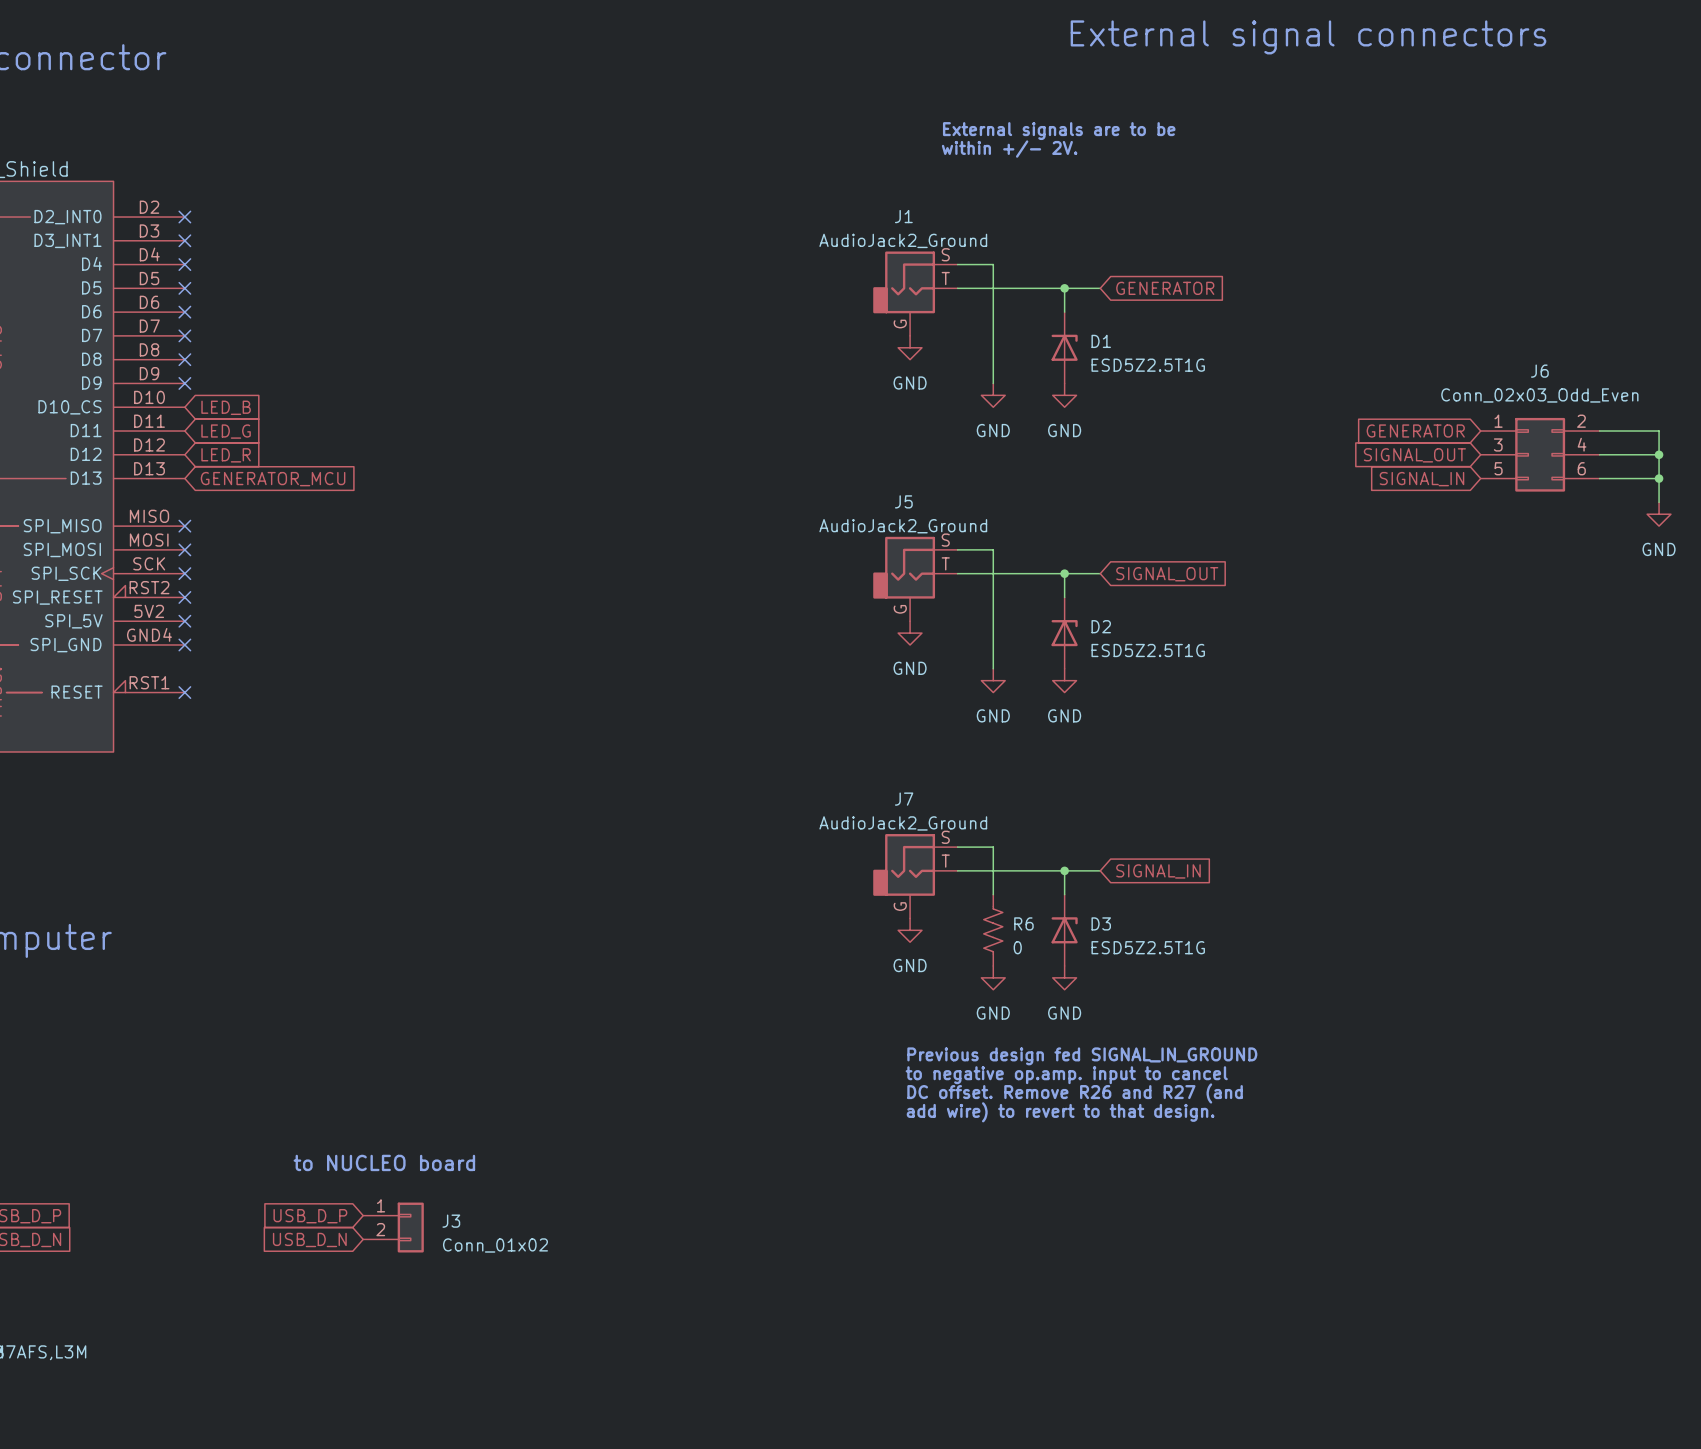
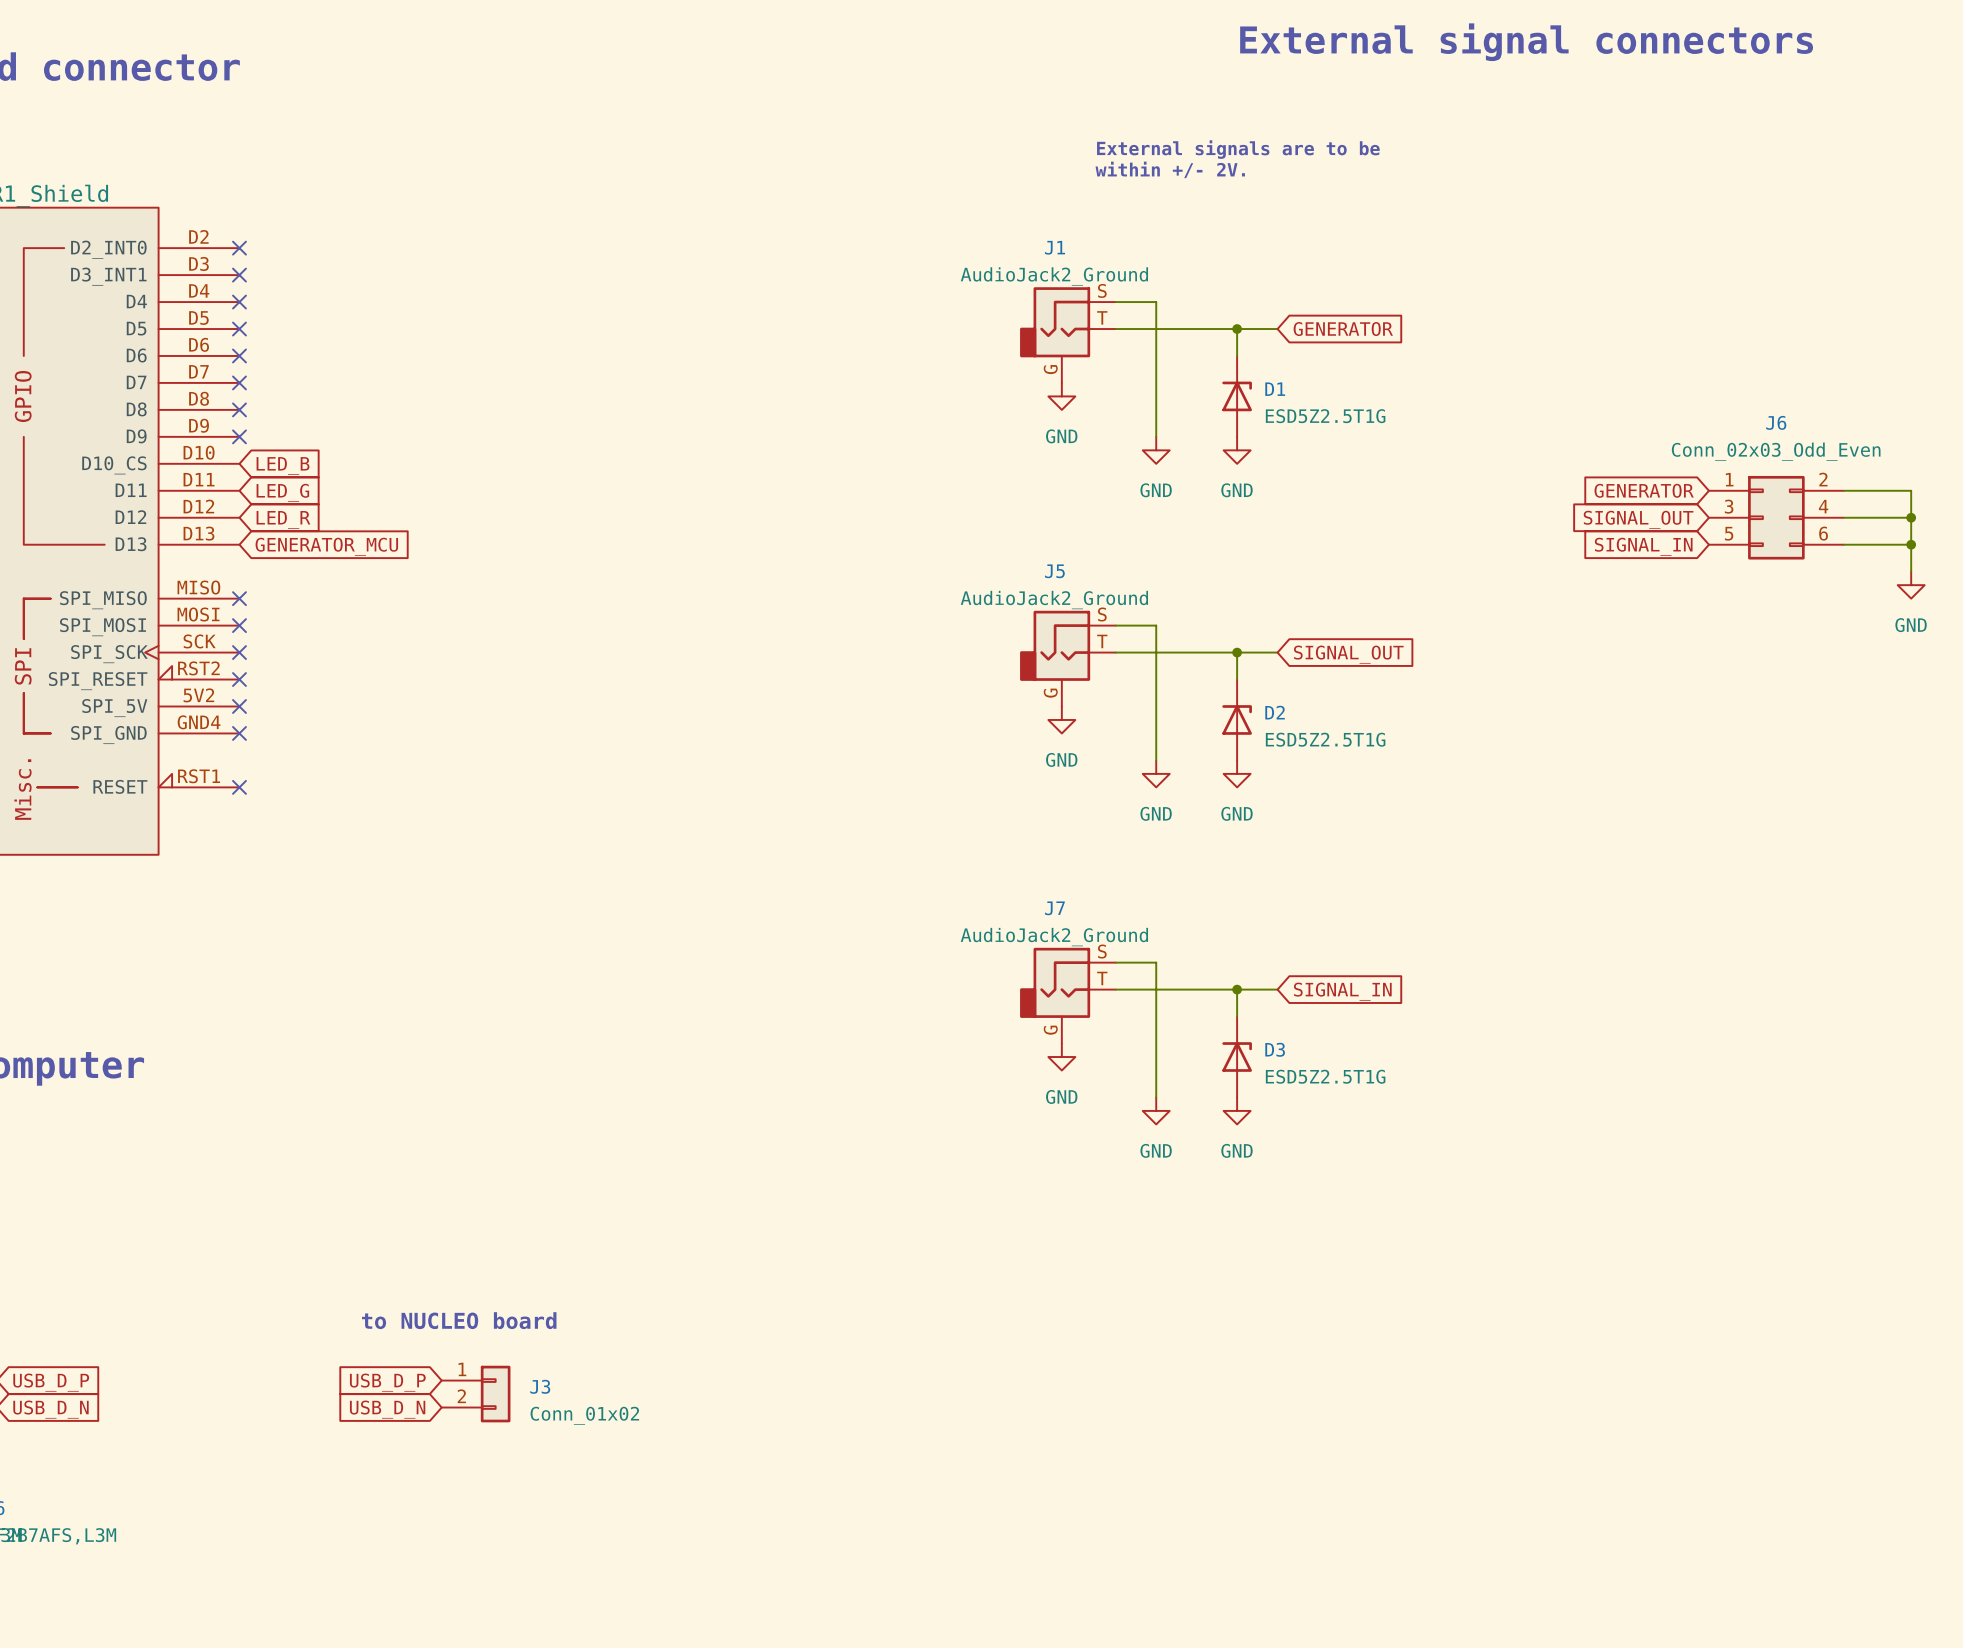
R6: 0 (993, 930) -> none
text: Previous design fed SIGNAL_IN_GROUND (1082, 1056) -> none
text: to negative op.amp. input to cancel (1066, 1075) -> none
text: DC offset. Remove R26 and R27 (and (1075, 1093) -> none
text: add wire) to revert to that design. (1060, 1112) -> none

